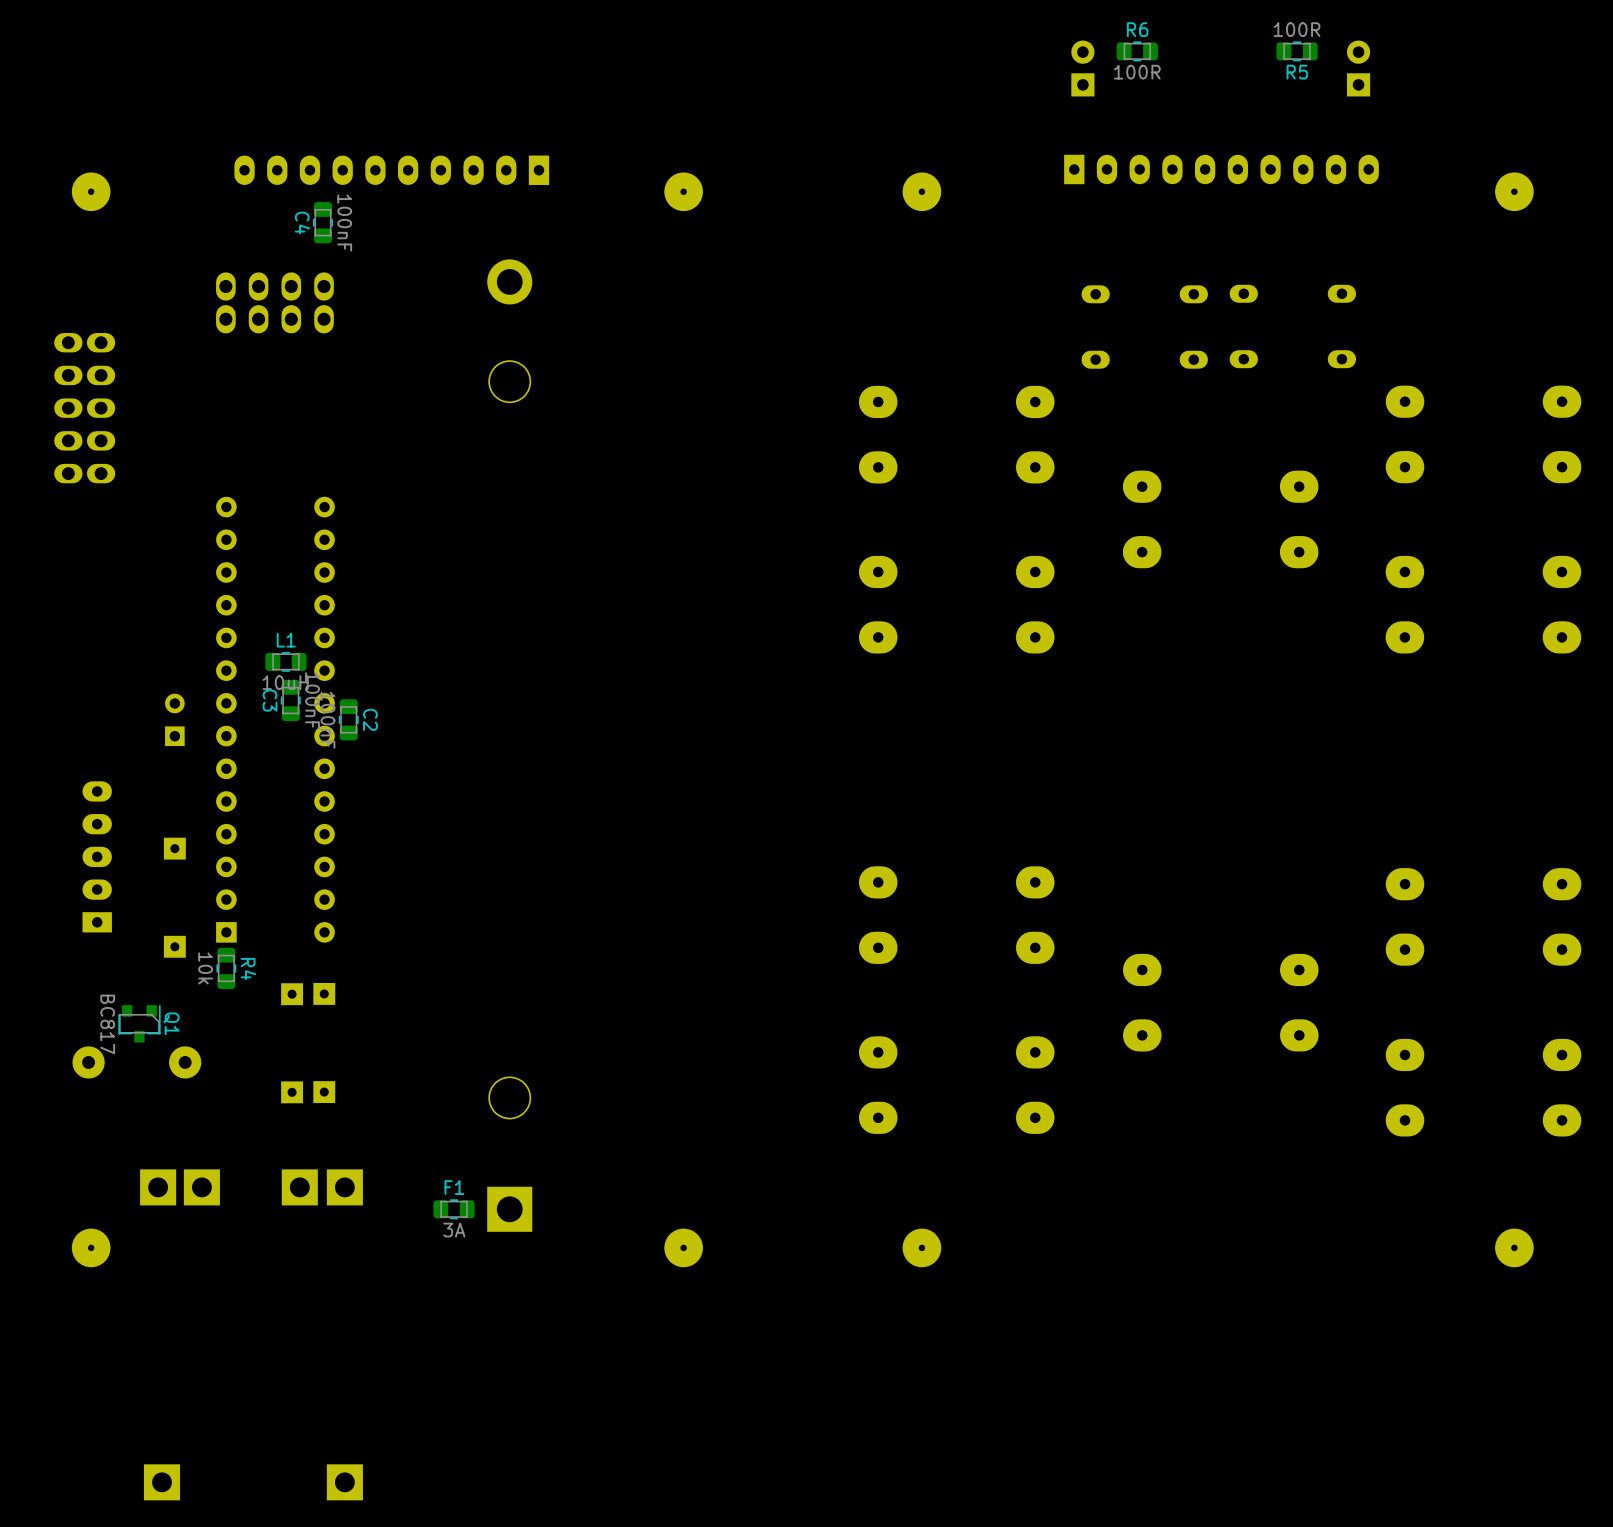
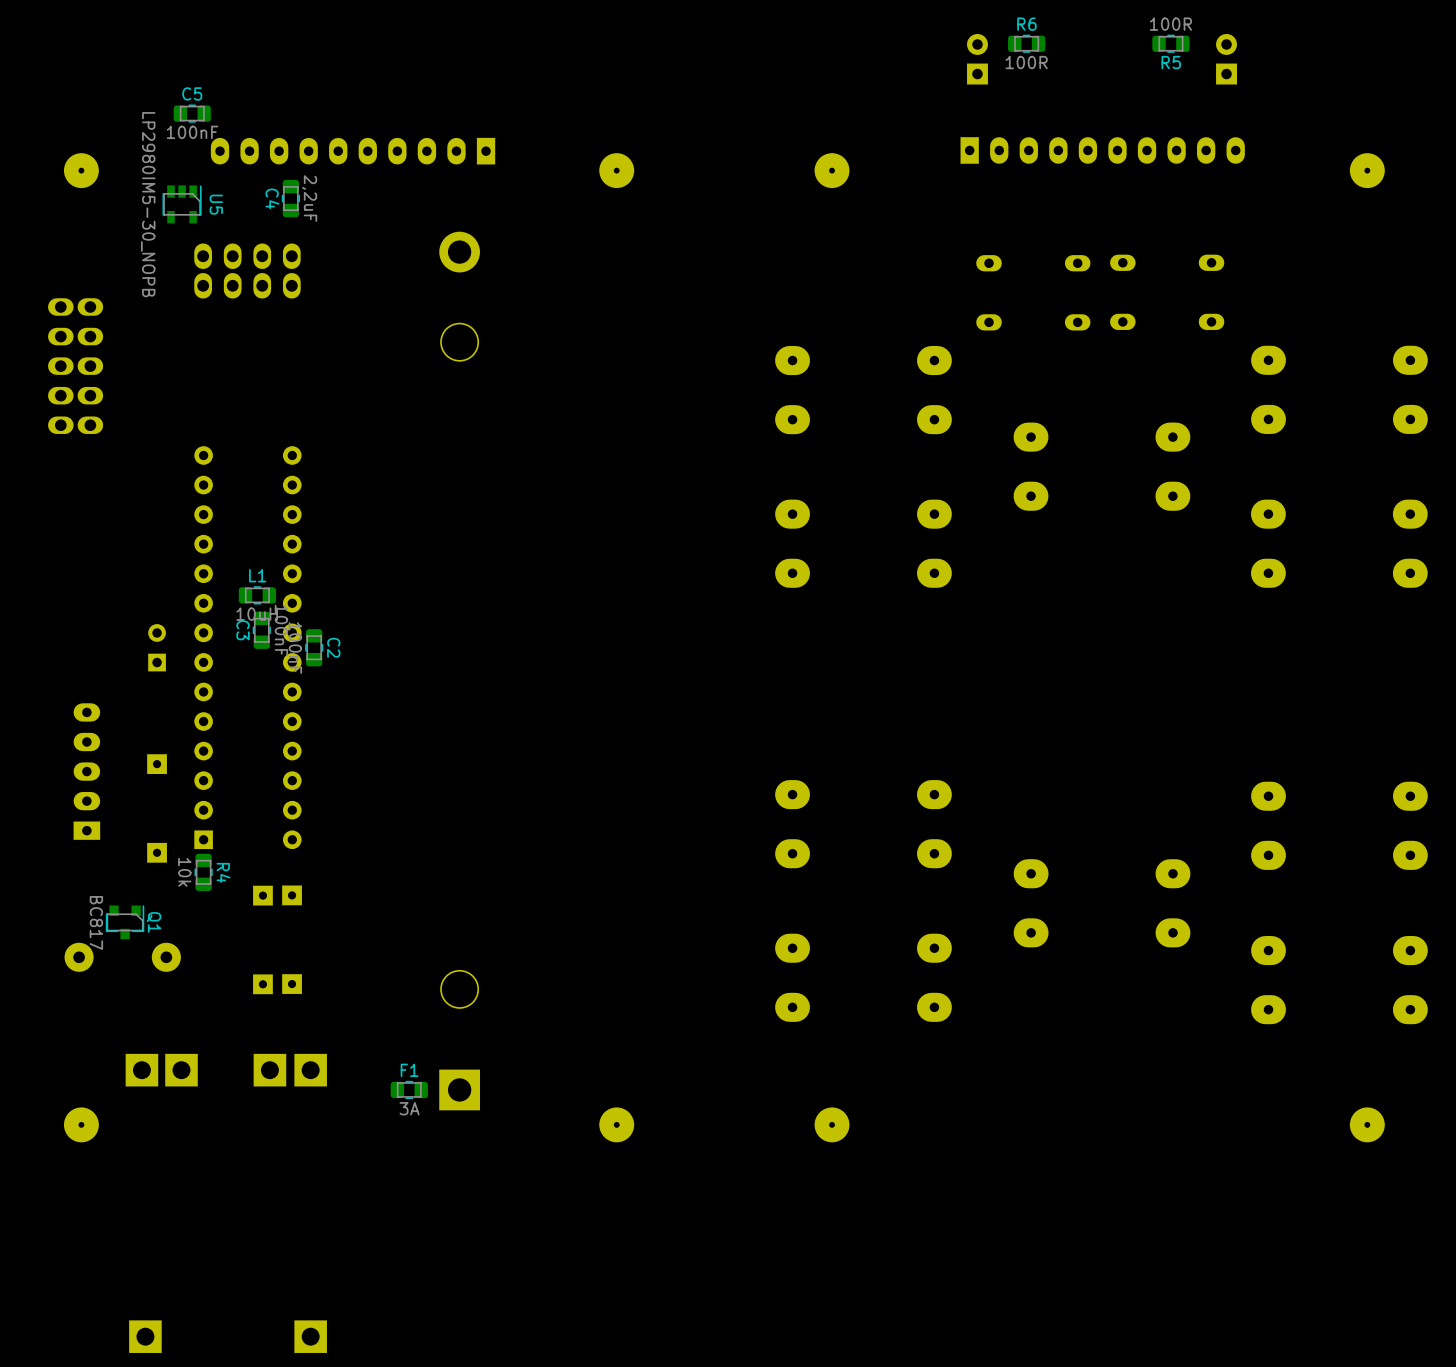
C5: none -> 100nF (192, 113)
C4 value: 100nF (344, 222) -> 2,2uF (309, 198)
U5: none -> LP2980IM5-30_NOPB (182, 204)

